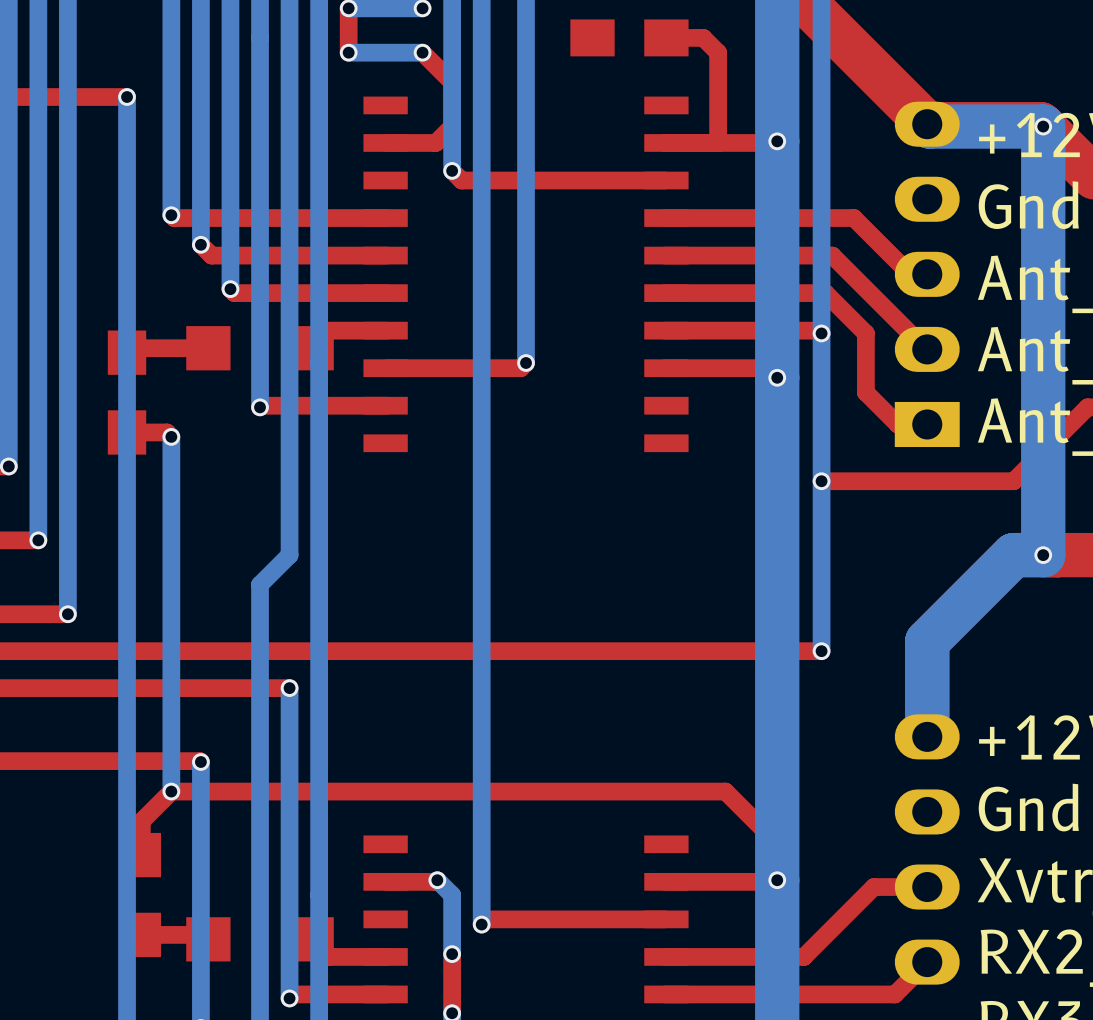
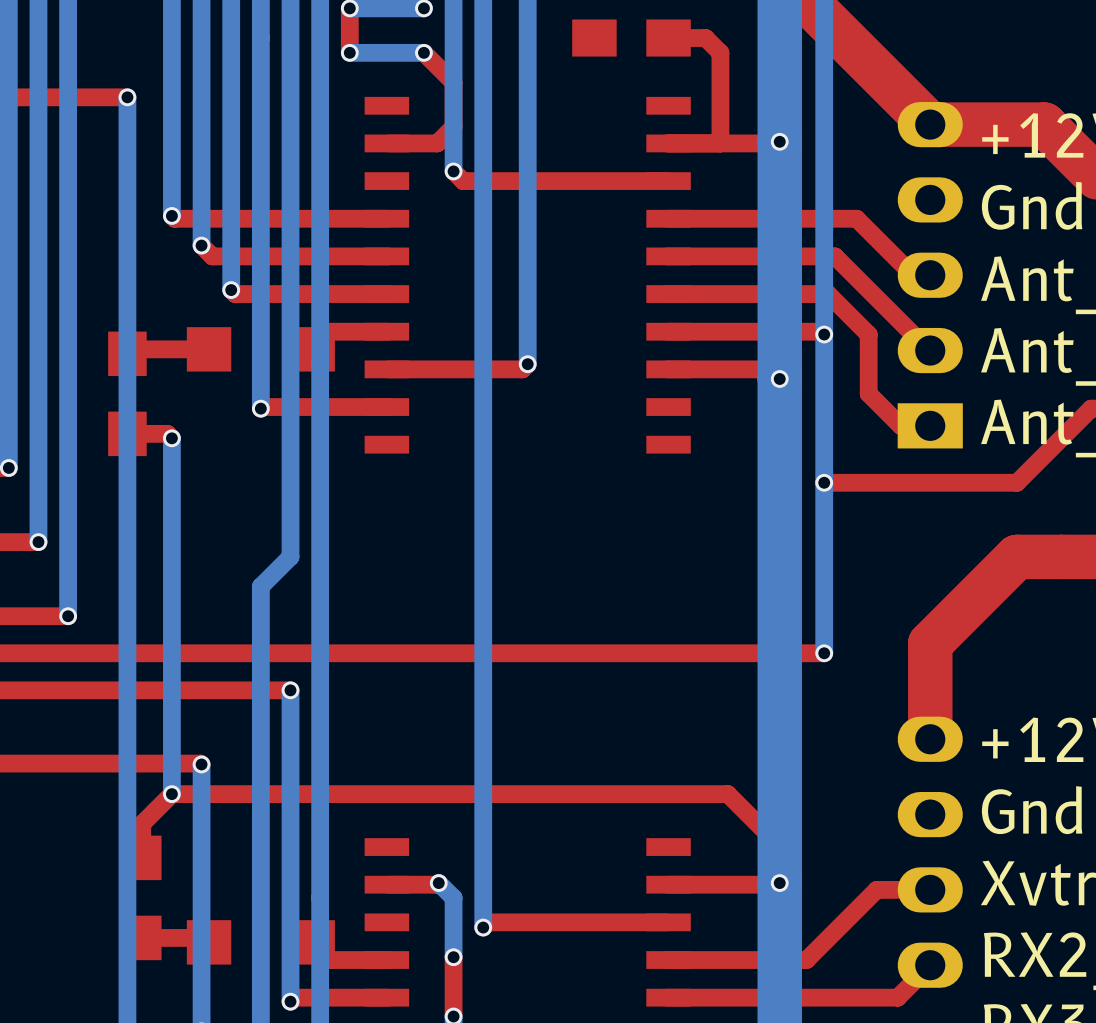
bottom track: (927, 124) (929, 126) (1043, 126) (1043, 555) (1013, 555) (927, 641) (927, 736) -> none
via: (1043, 126) -> none
via: (1043, 555) -> none

